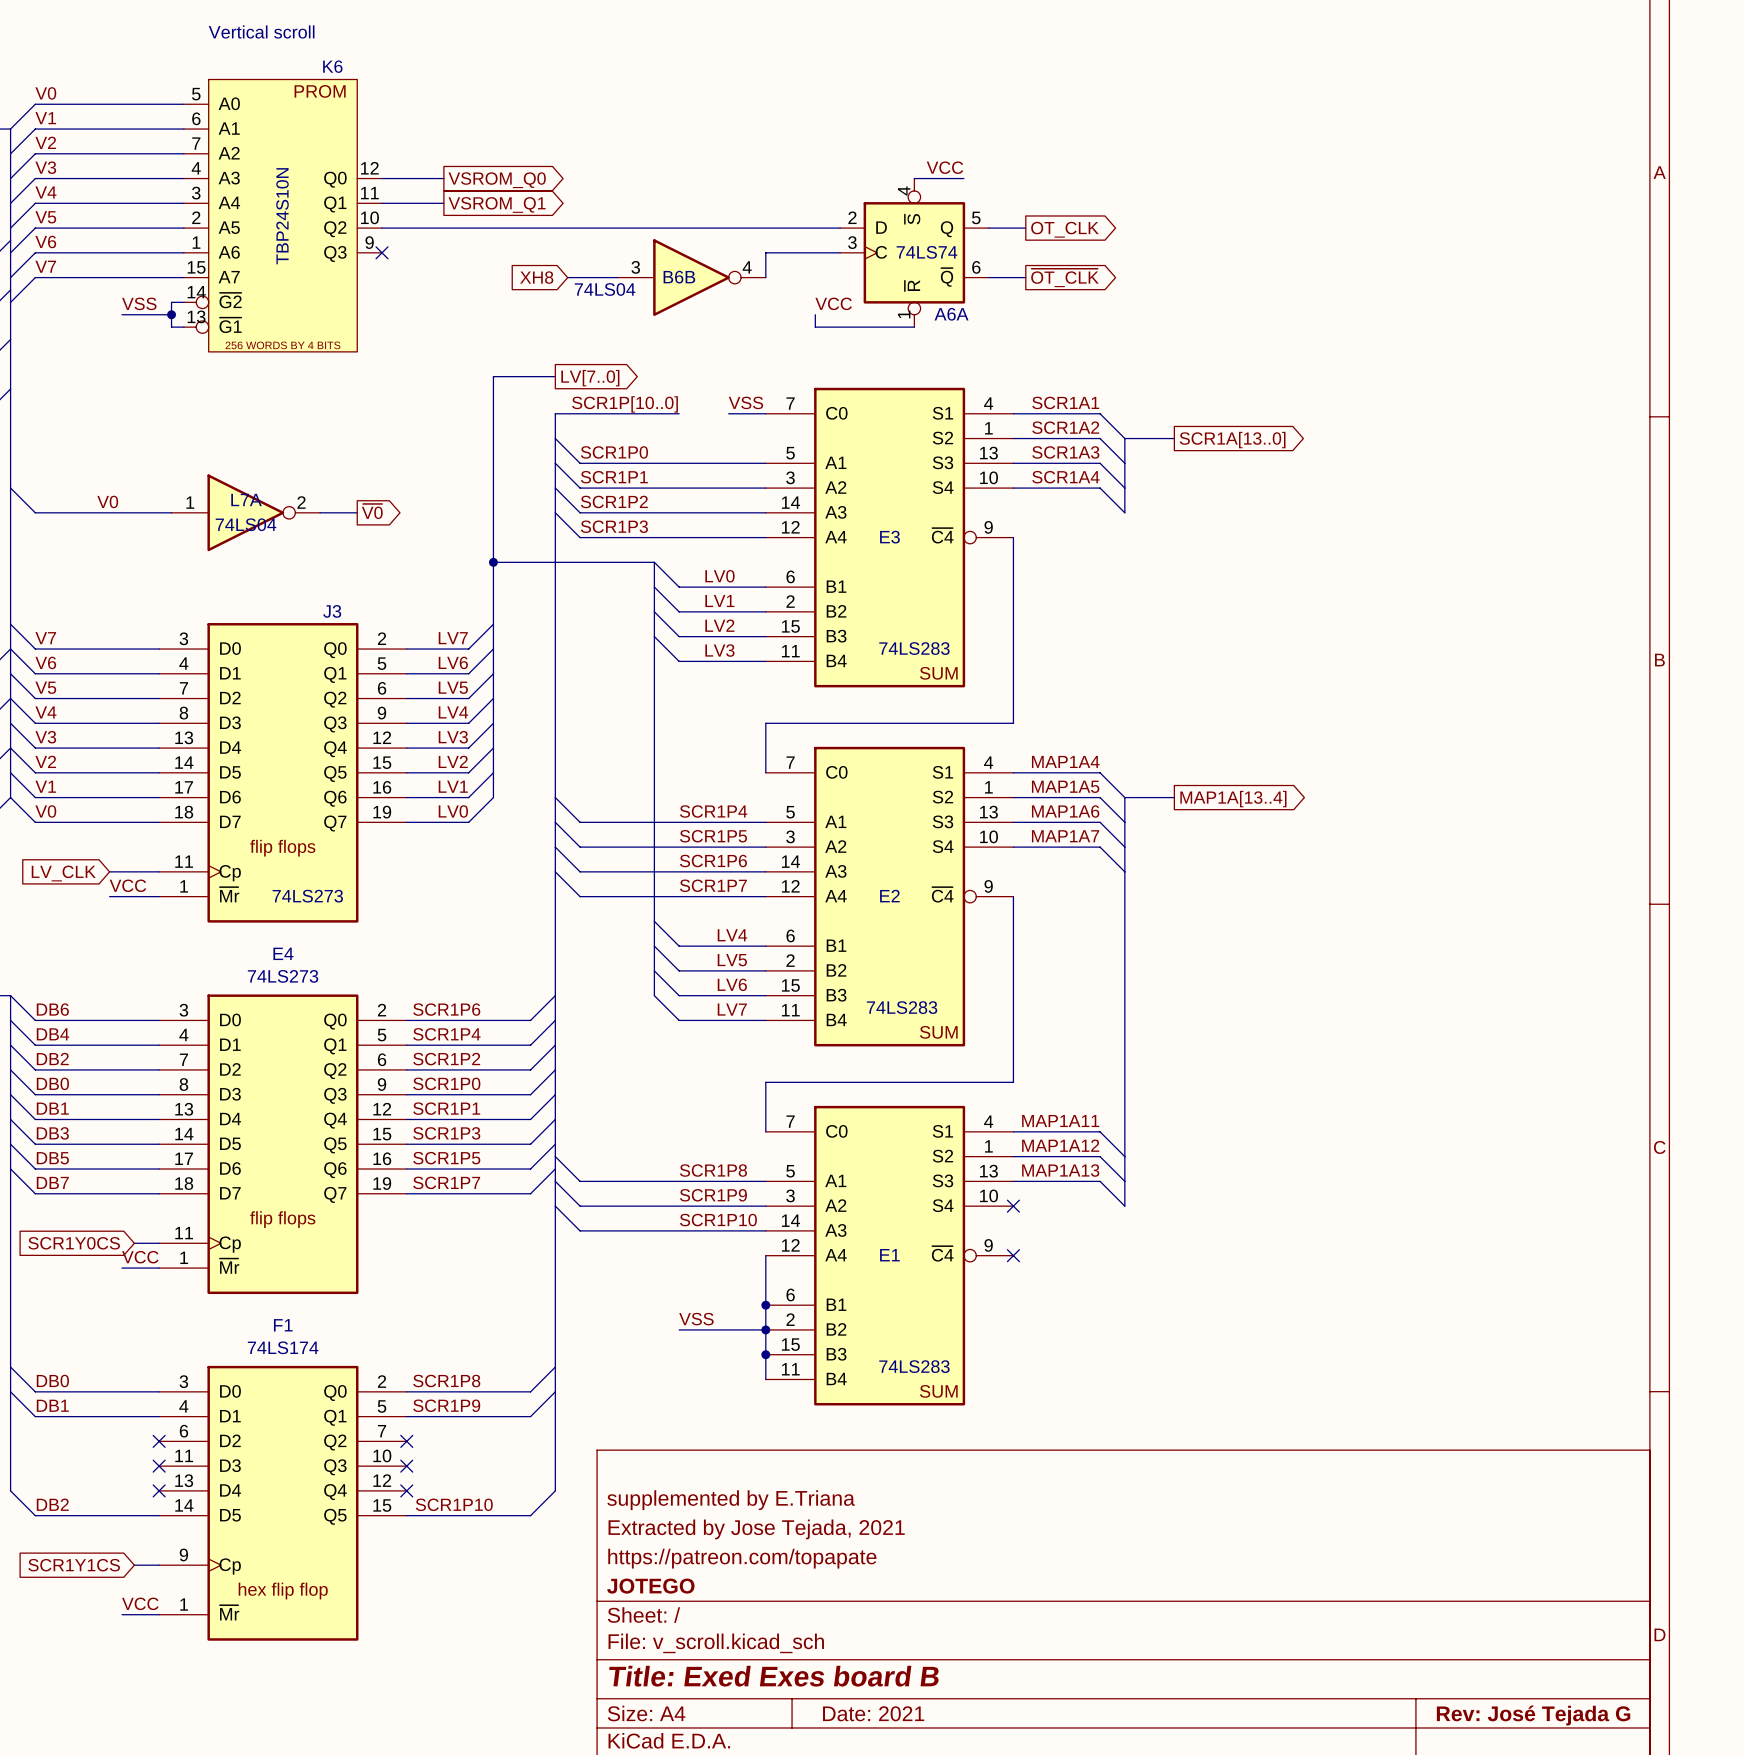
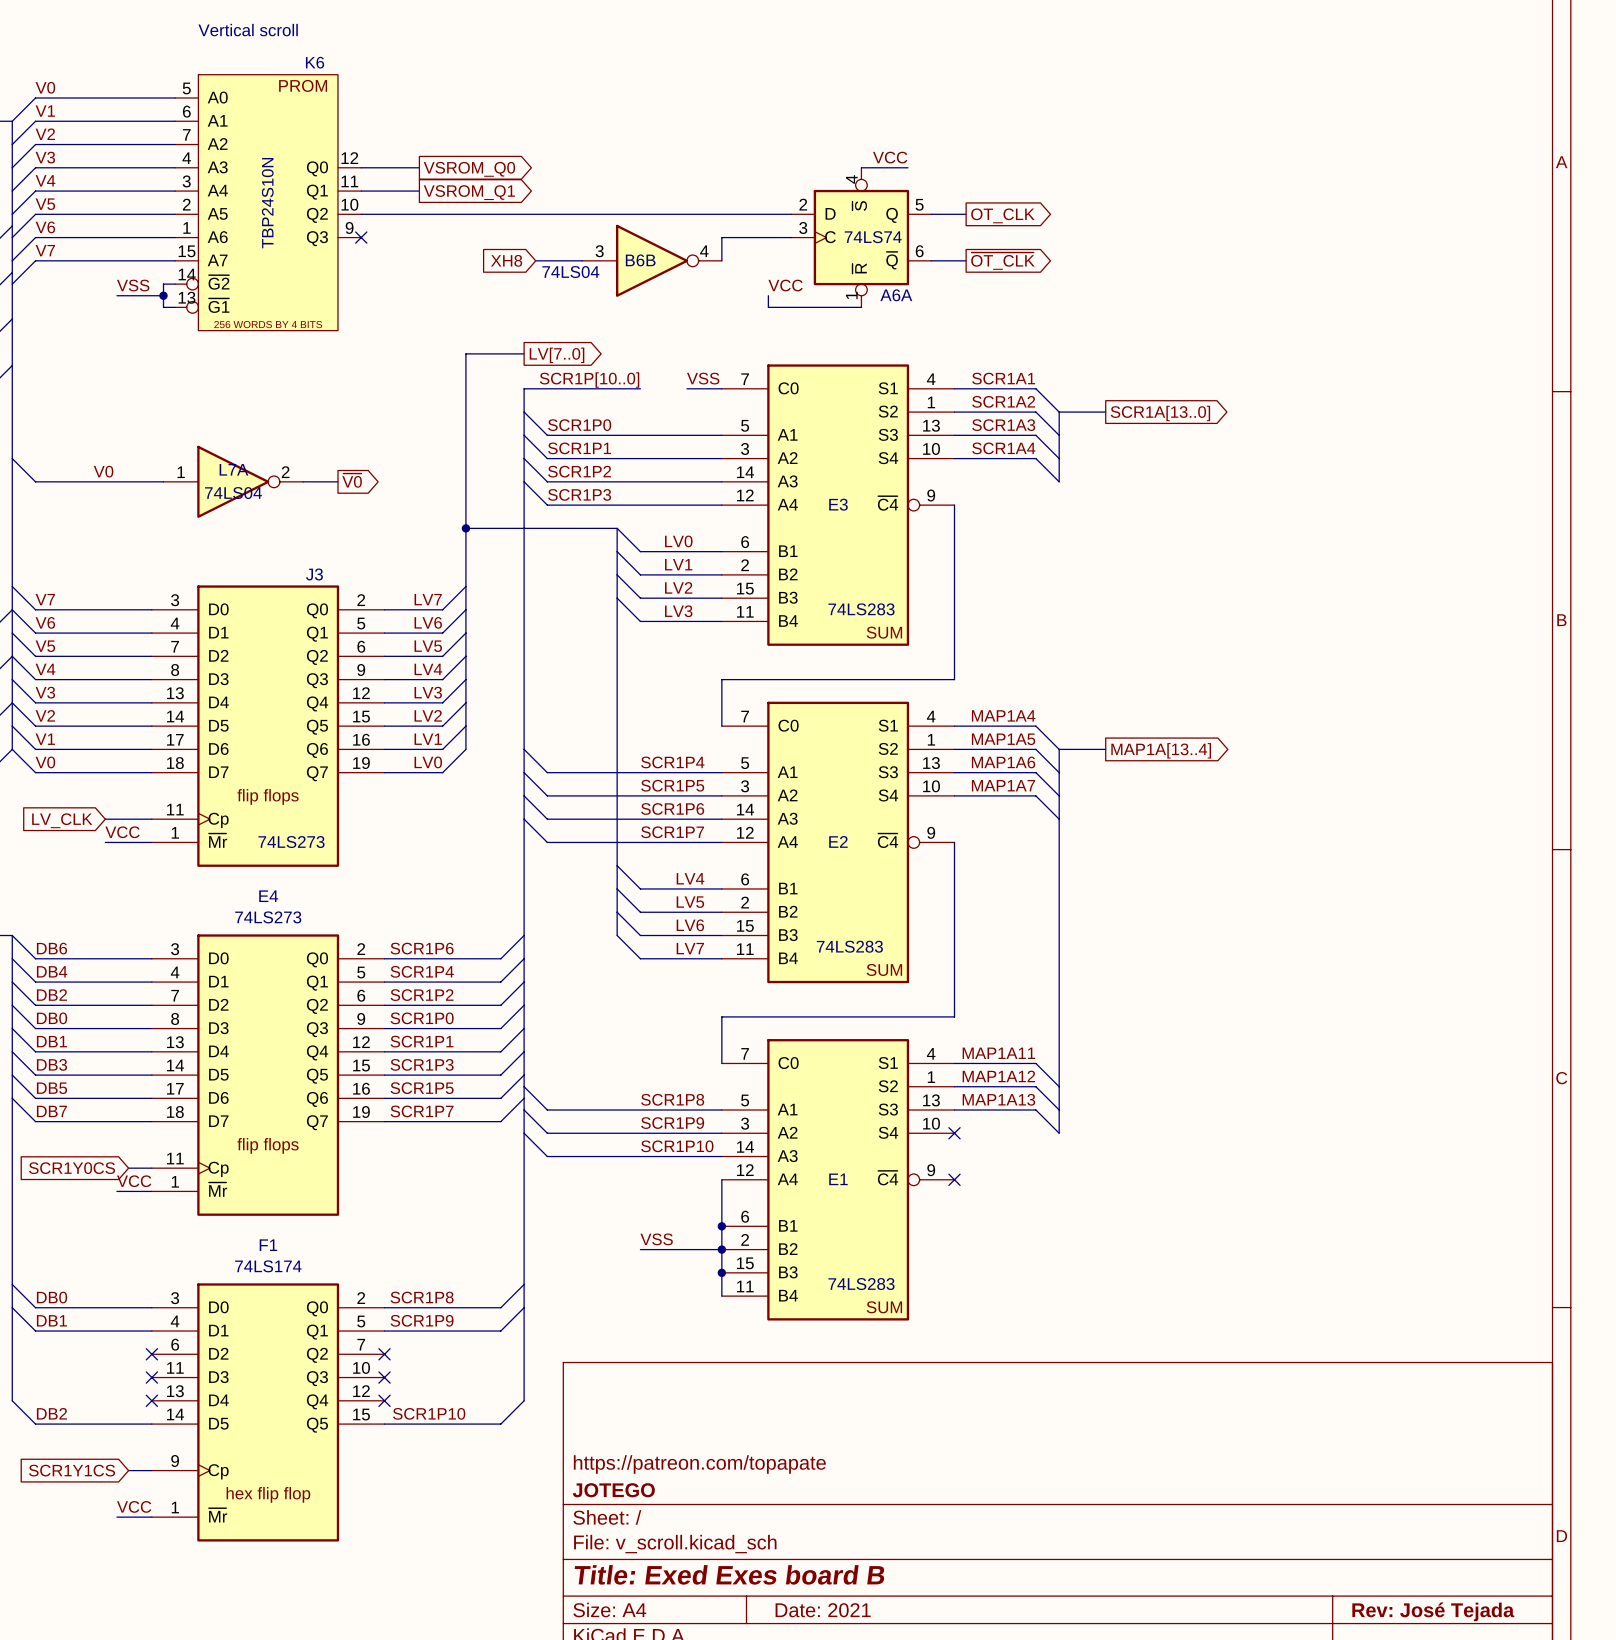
title block: supplemented by E.Triana (731, 1500) -> none
title block: Extracted by Jose Tejada, 2021 (756, 1529) -> none
title block: Rev: José Tejada G (1533, 1715) -> Rev: José Tejada (1433, 1611)

